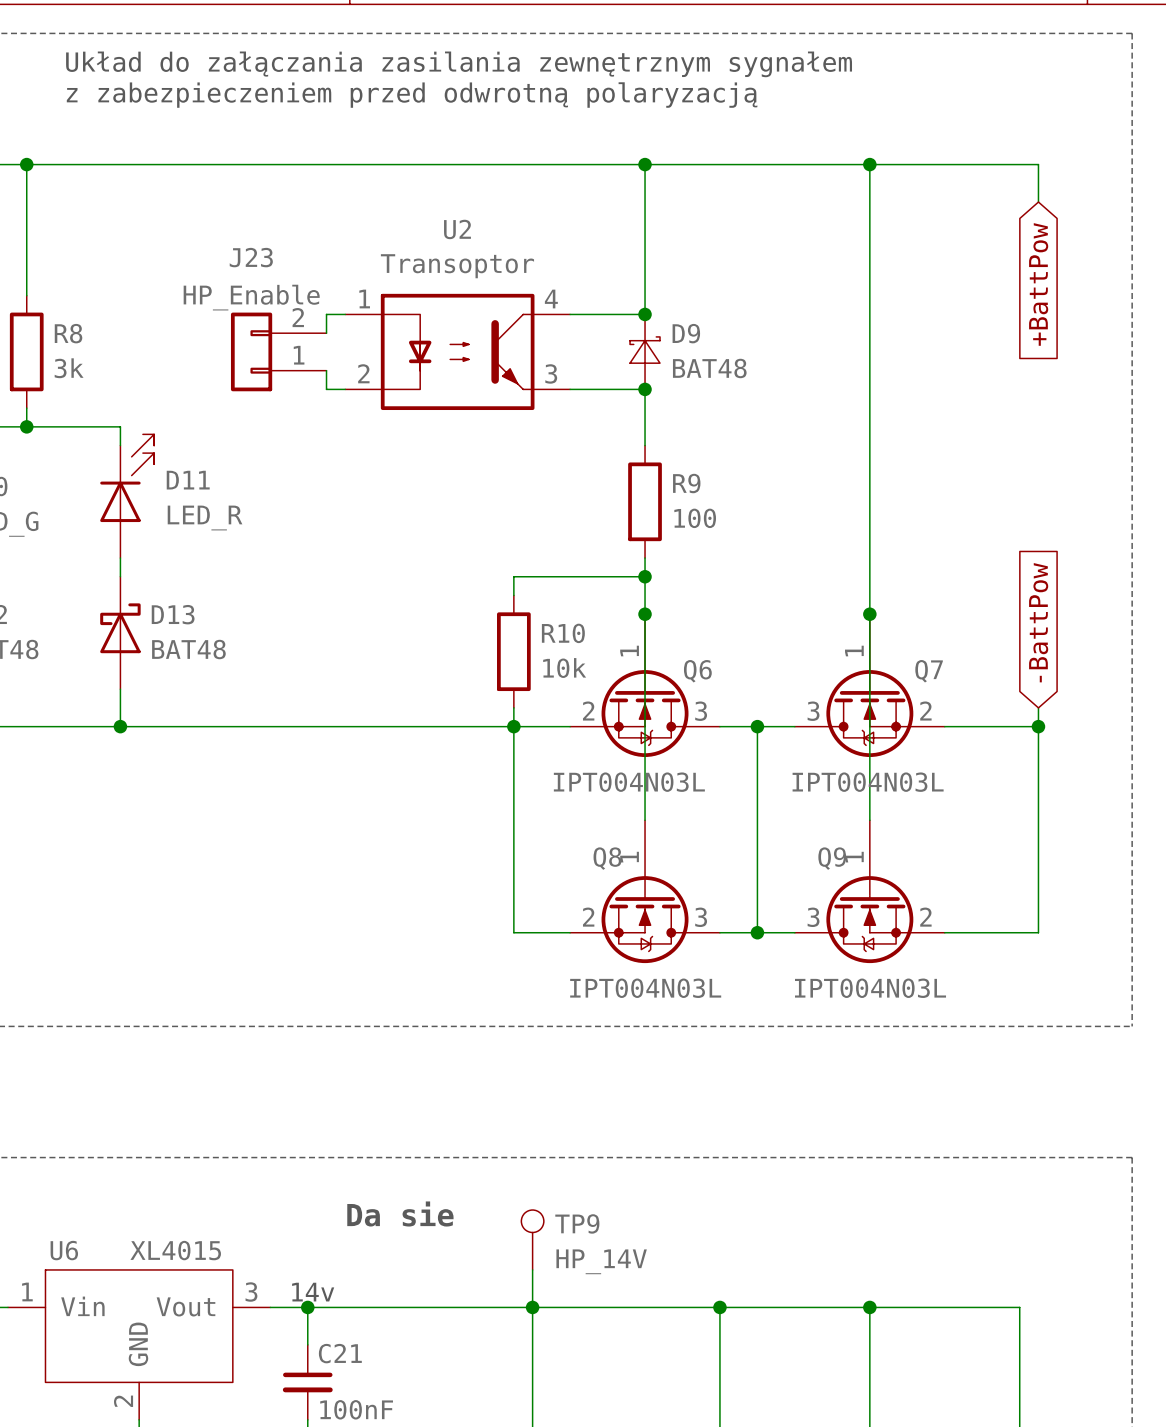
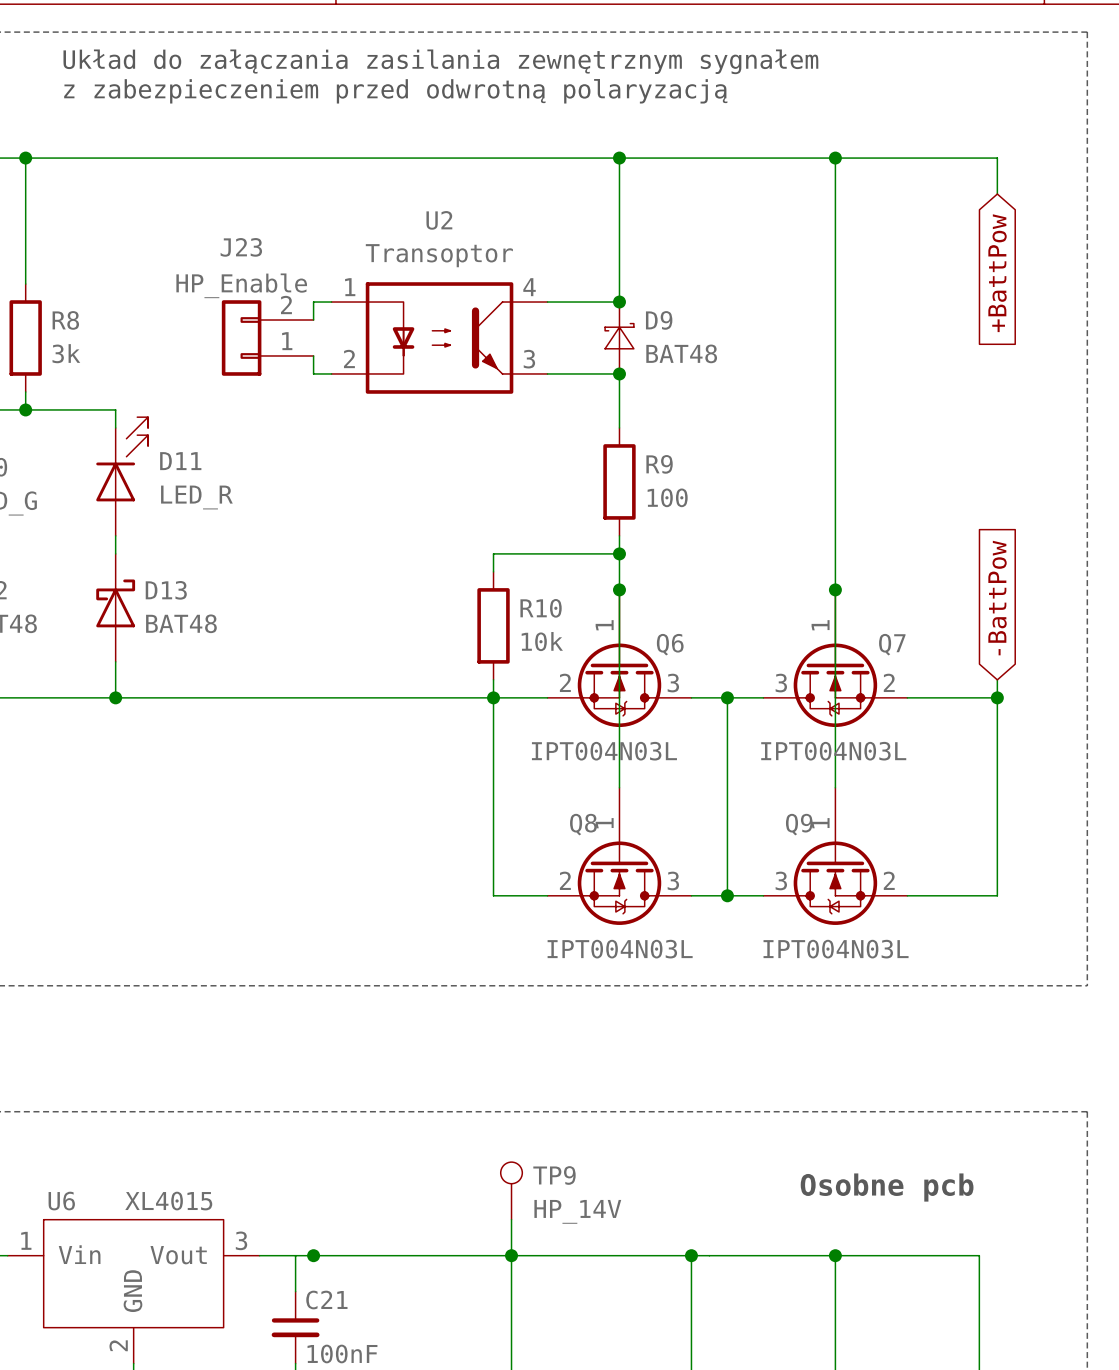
text: Da sie (400, 1214) -> none
text: none -> Osobne pcb (887, 1187)
text: 14v (313, 1292) -> none
junction position: (307, 1307) -> (313, 1255)

